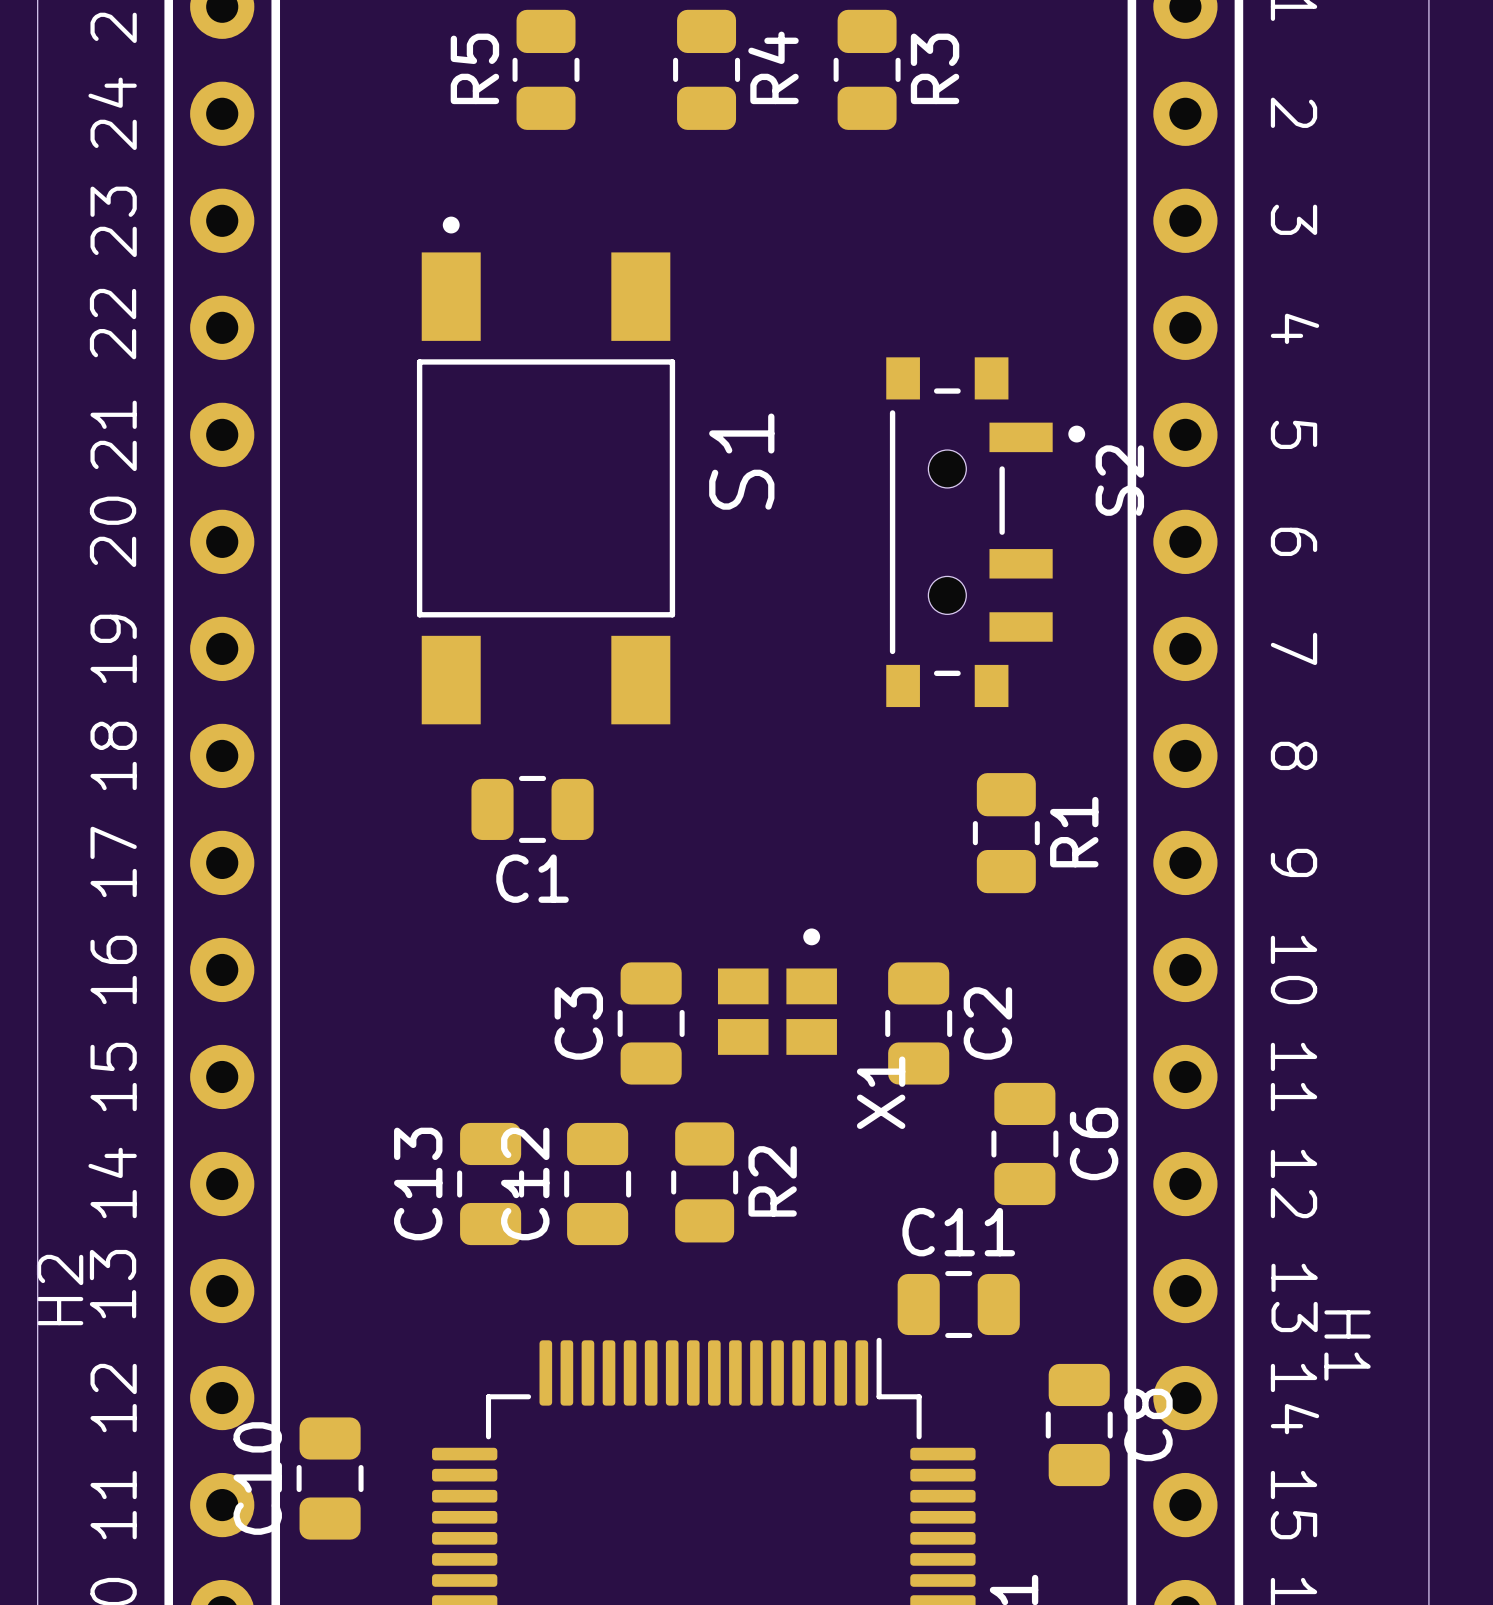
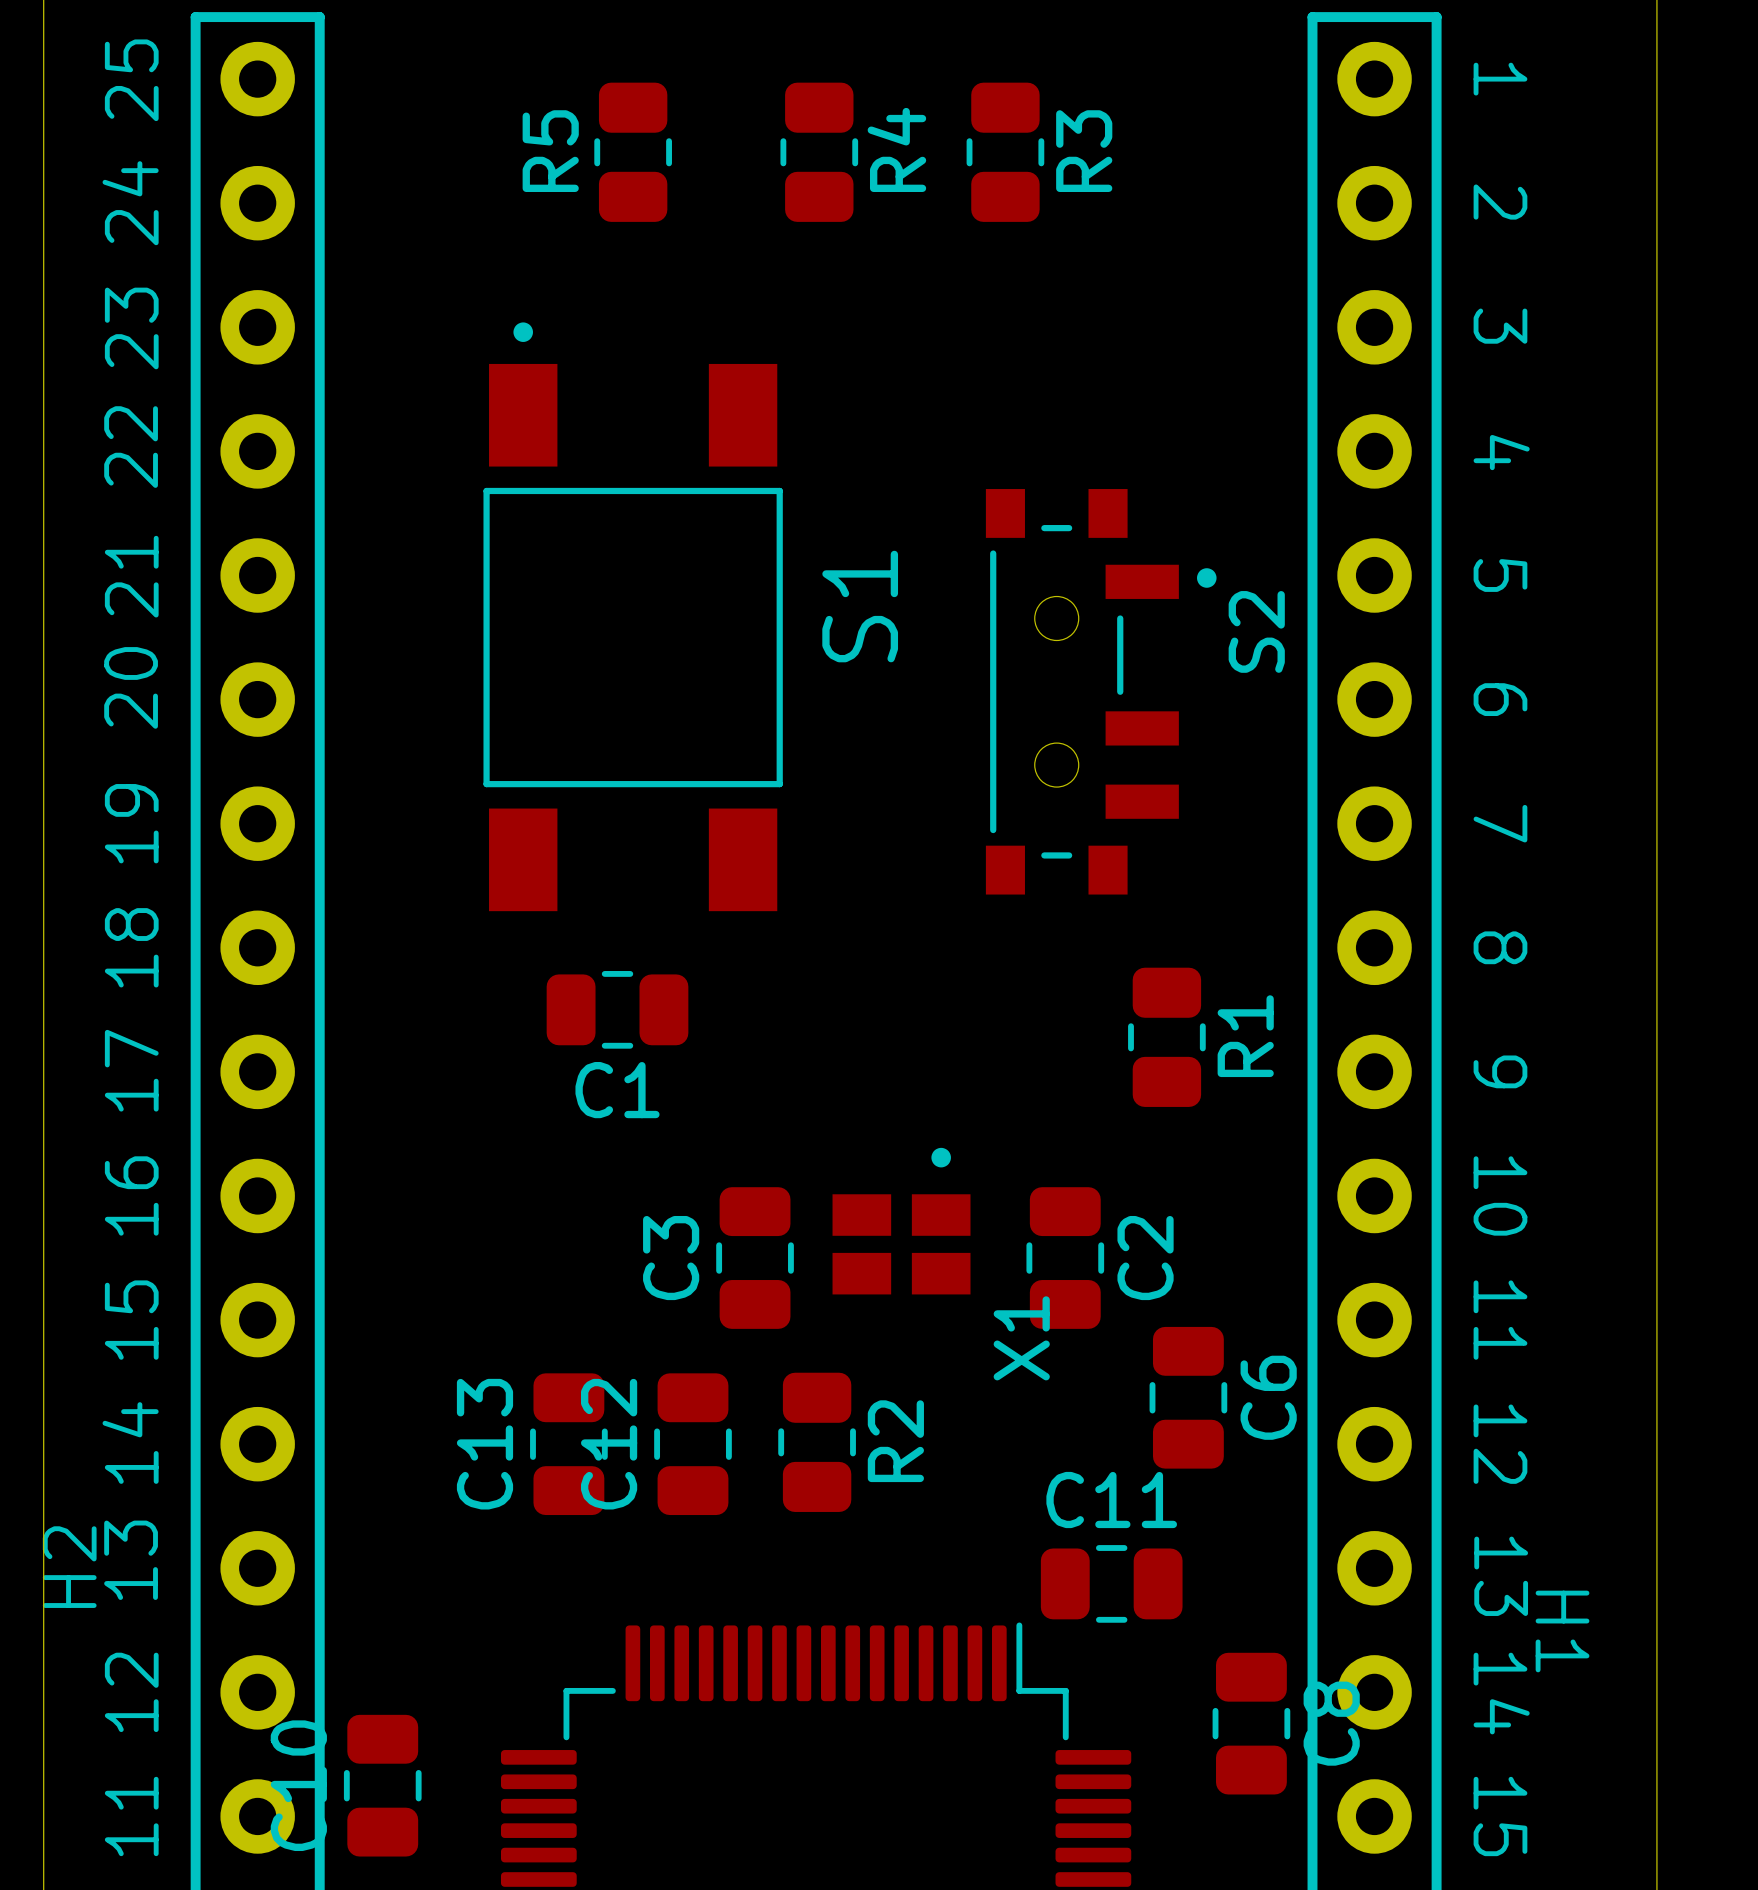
S2 position: (985, 532) -> (1101, 691)

